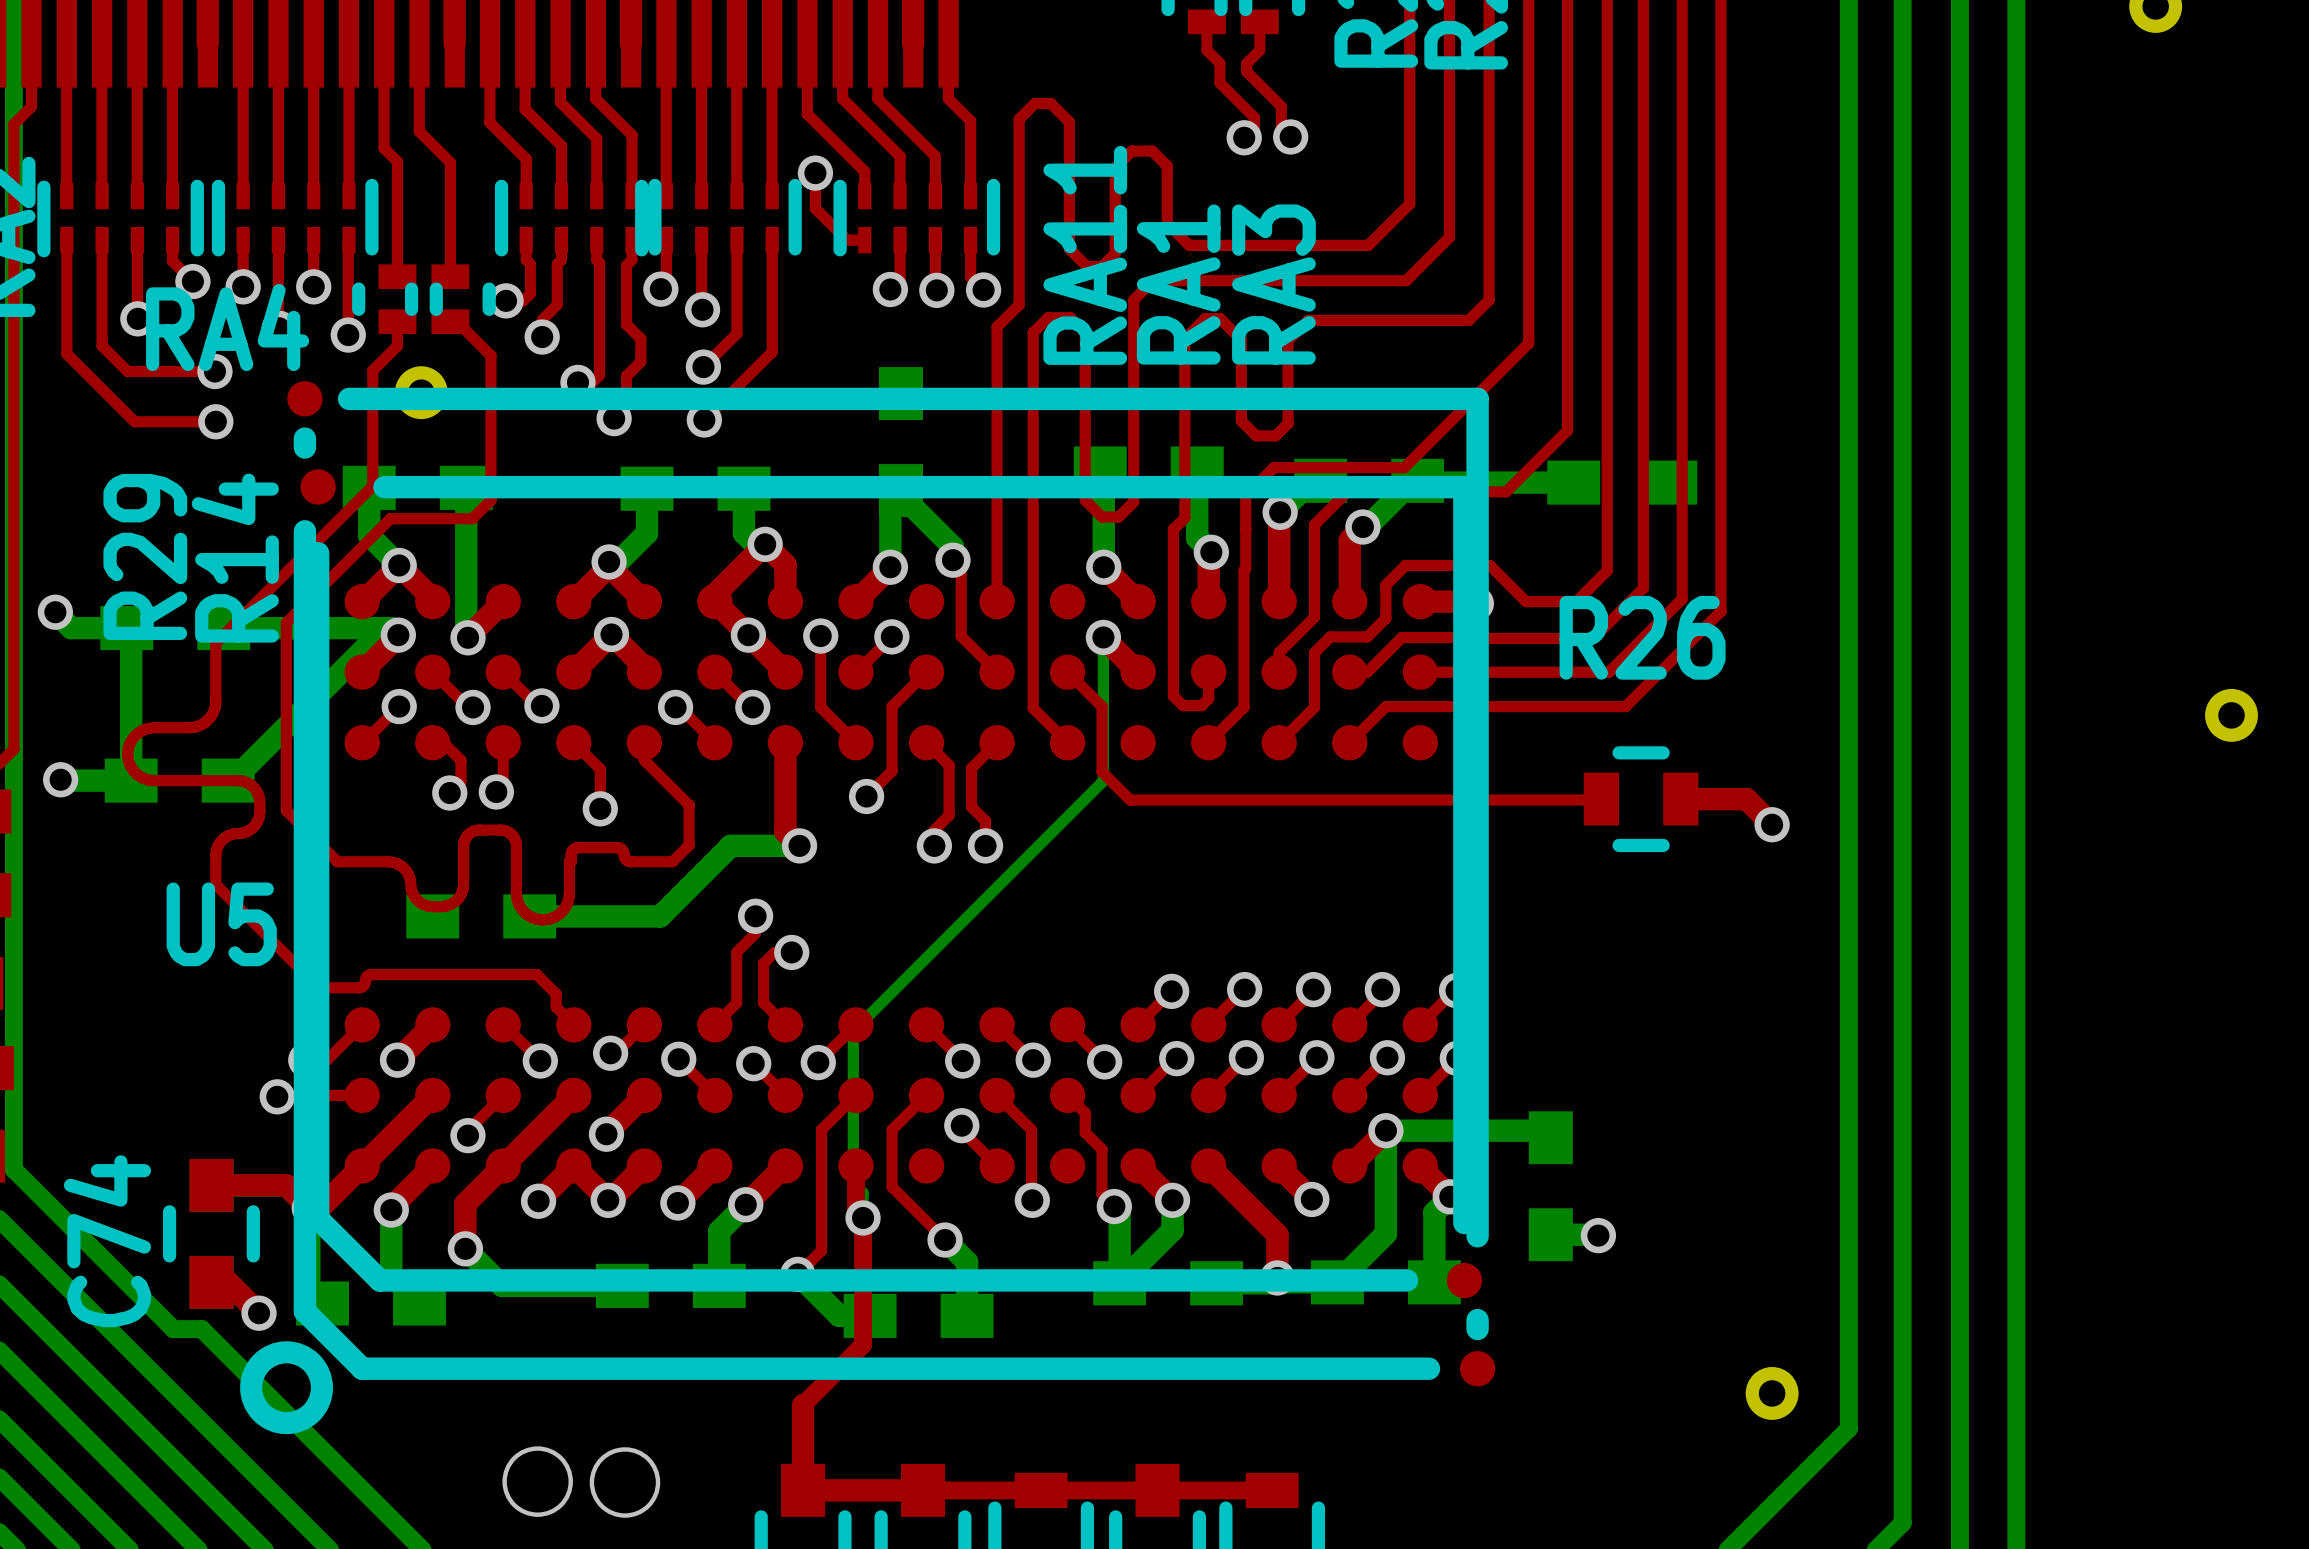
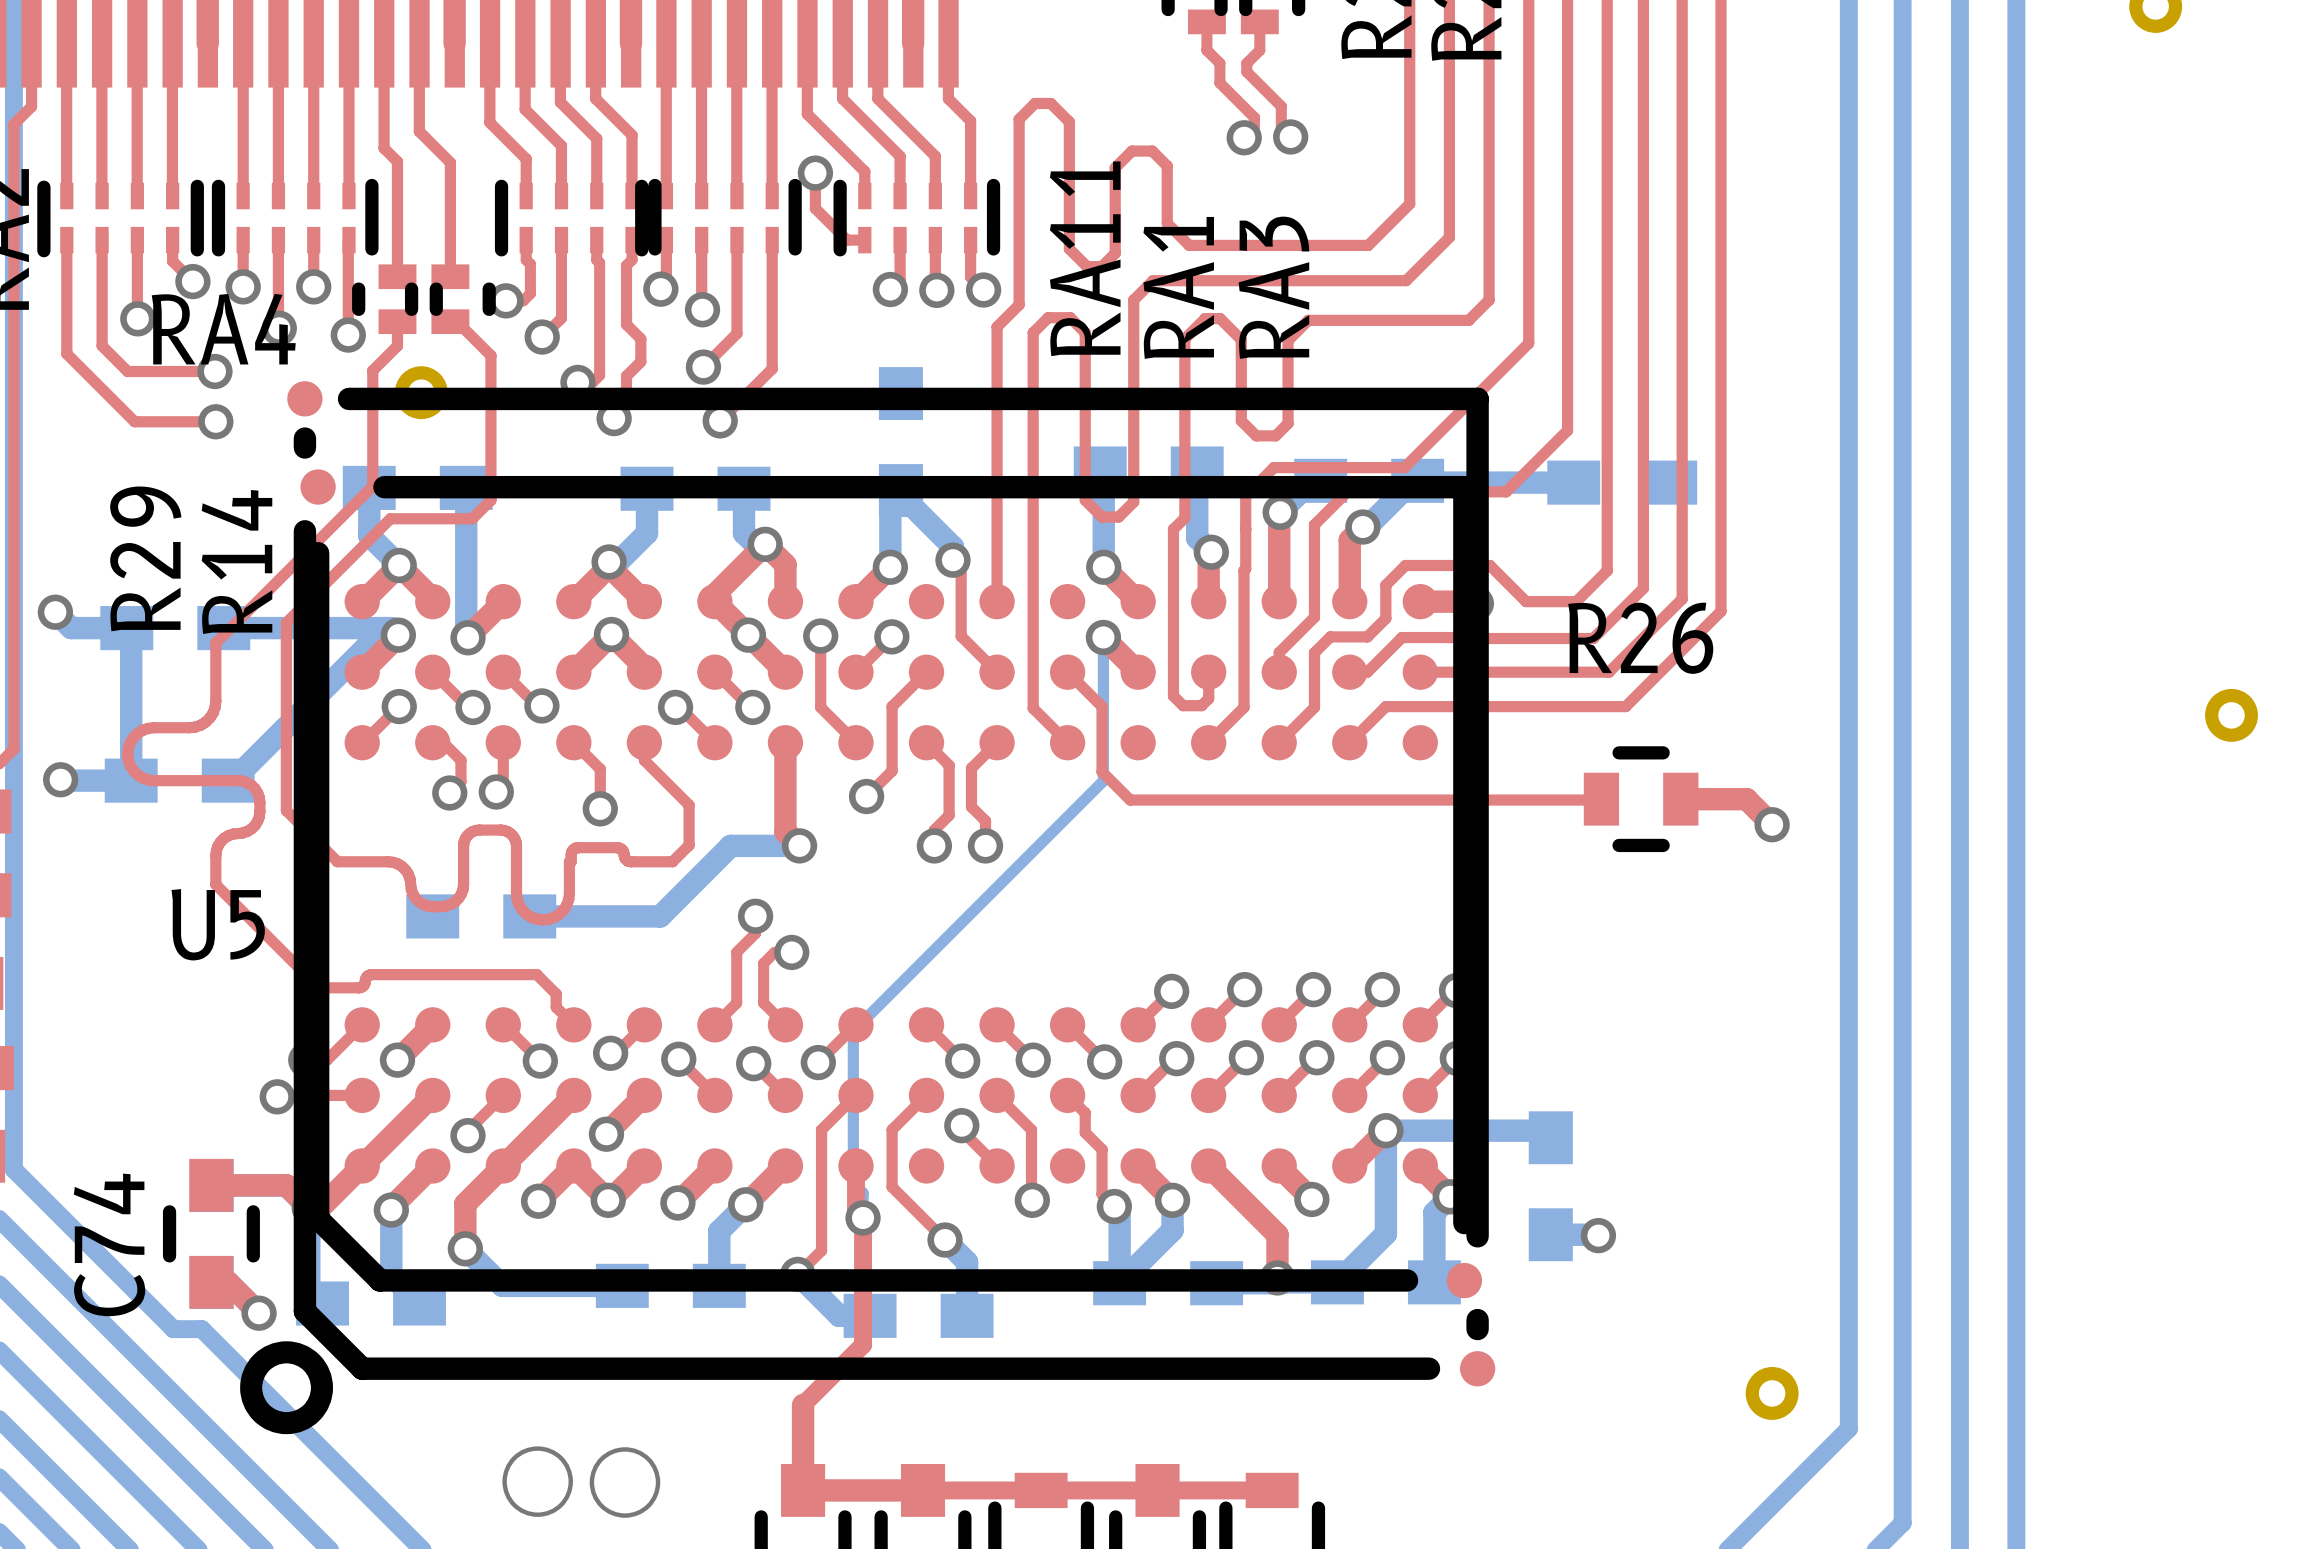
top track: (561, 259) (557, 264) (557, 304) (542, 319) (542, 337) -> (561, 259) (561, 318) (542, 337)
top track: (772, 352) (704, 420) -> (772, 352) (772, 368) (720, 420)
via position: (704, 420) -> (720, 420)

